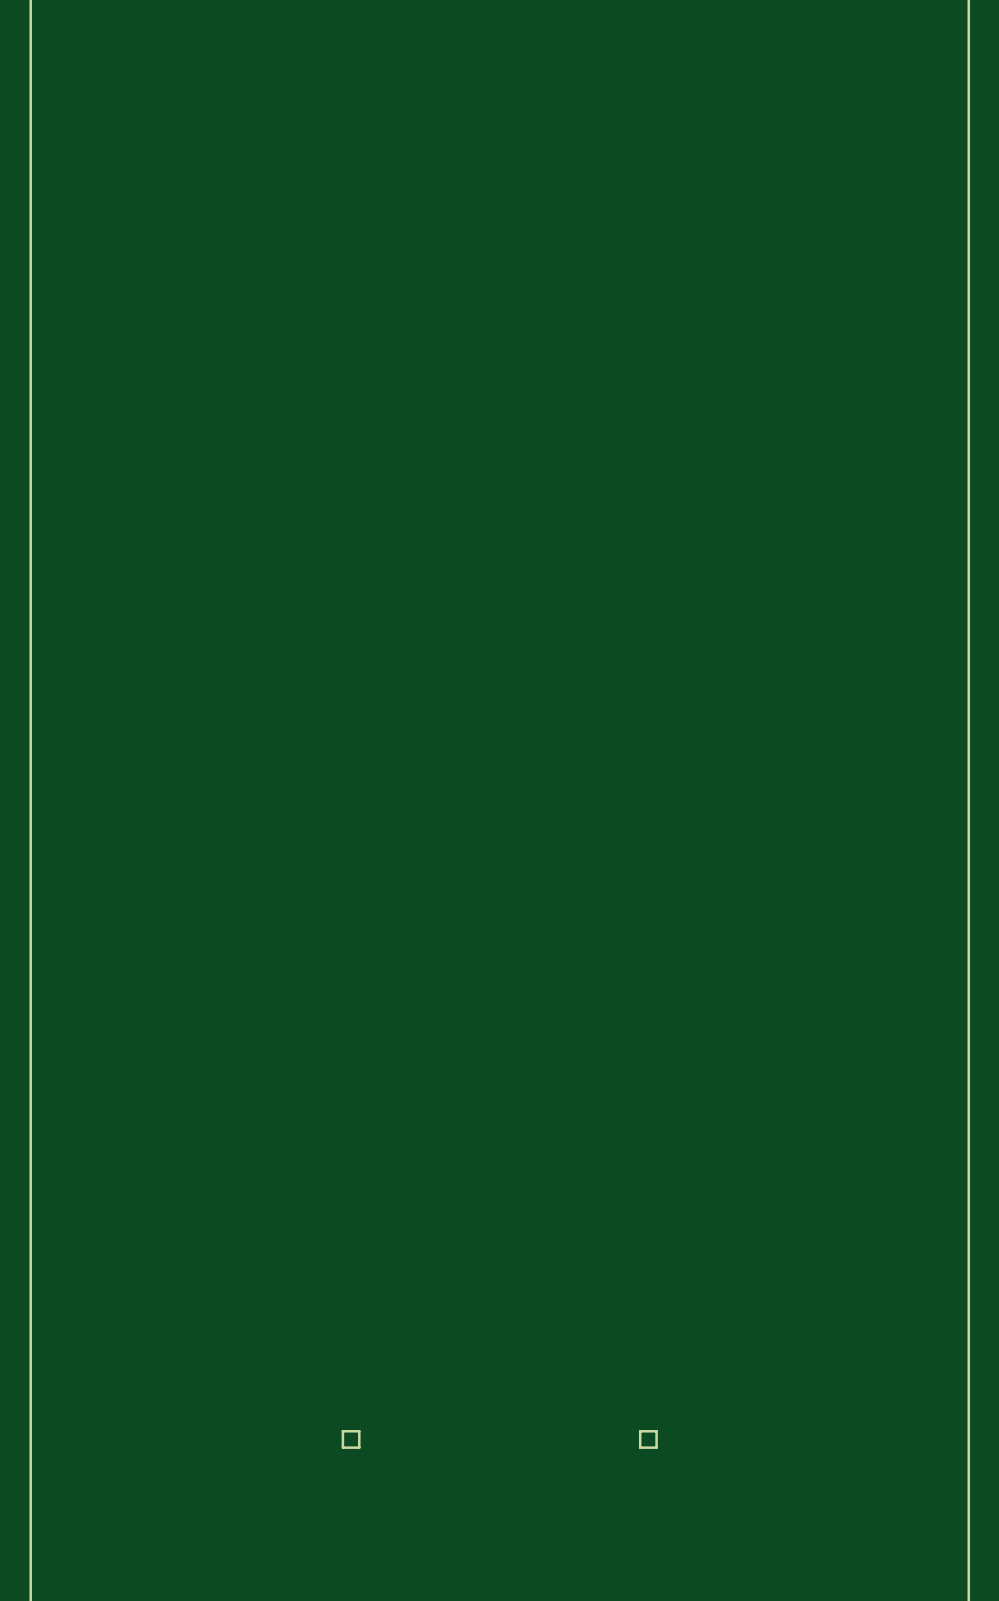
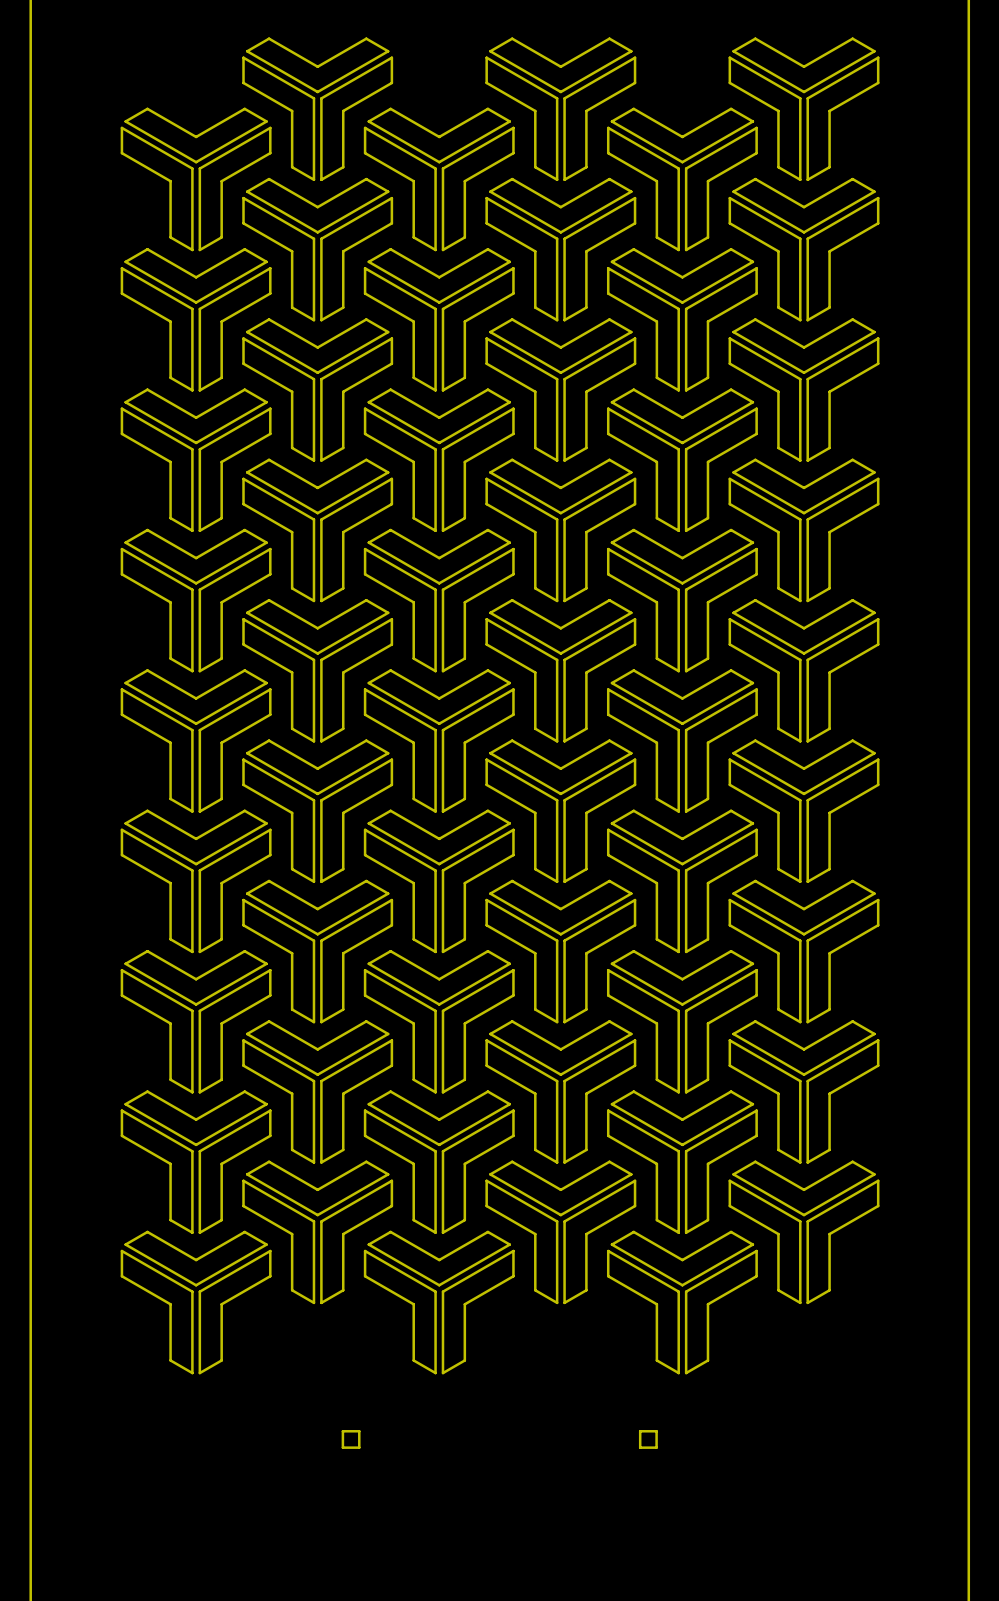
board edge: none -> (366, 38) (388, 51) (317, 91) (247, 51) (269, 38) (317, 66) (366, 38)
board edge: none -> (609, 38) (631, 51) (560, 91) (490, 51) (512, 38) (560, 66) (609, 38)
board edge: none -> (852, 38) (874, 51) (804, 91) (733, 51) (755, 38) (804, 66) (852, 38)
board edge: none -> (243, 57) (313, 98) (313, 179) (292, 167) (292, 111) (243, 82) (243, 57)
board edge: none -> (391, 57) (391, 82) (343, 111) (343, 167) (321, 179) (321, 98) (391, 57)
board edge: none -> (486, 57) (557, 98) (557, 179) (535, 167) (535, 111) (486, 82) (486, 57)
board edge: none -> (635, 57) (635, 82) (586, 111) (586, 167) (564, 179) (564, 98) (635, 57)
board edge: none -> (729, 57) (729, 82) (778, 111) (778, 167) (800, 179) (800, 98) (729, 57)
board edge: none -> (878, 57) (807, 98) (807, 179) (829, 167) (829, 111) (878, 82) (878, 57)
board edge: none -> (244, 108) (266, 121) (196, 162) (125, 121) (147, 108) (196, 136) (244, 108)
board edge: none -> (487, 108) (509, 121) (439, 162) (368, 121) (390, 108) (439, 136) (487, 108)
board edge: none -> (731, 108) (752, 121) (682, 162) (611, 121) (633, 108) (682, 136) (731, 108)
board edge: none -> (121, 127) (192, 168) (192, 249) (170, 237) (170, 181) (121, 153) (121, 127)
board edge: none -> (270, 127) (199, 168) (199, 249) (221, 237) (221, 181) (270, 153) (270, 127)
board edge: none -> (365, 127) (435, 168) (435, 249) (413, 237) (413, 181) (365, 153) (365, 127)
board edge: none -> (513, 127) (442, 168) (442, 249) (464, 237) (464, 181) (513, 153) (513, 127)
board edge: none -> (608, 127) (678, 168) (678, 249) (656, 237) (656, 181) (608, 153) (608, 127)
board edge: none -> (756, 127) (756, 153) (707, 181) (707, 237) (686, 249) (686, 168) (756, 127)
board edge: none -> (366, 179) (388, 191) (317, 232) (247, 191) (269, 179) (317, 207) (366, 179)
board edge: none -> (609, 179) (560, 207) (512, 179) (490, 191) (560, 232) (631, 191) (609, 179)
board edge: none -> (852, 179) (874, 191) (804, 232) (733, 191) (755, 179) (804, 207) (852, 179)
board edge: none -> (243, 198) (313, 238) (313, 320) (292, 307) (292, 251) (243, 223) (243, 198)
board edge: none -> (391, 198) (321, 238) (321, 320) (343, 307) (343, 251) (391, 223) (391, 198)
board edge: none -> (486, 198) (557, 238) (557, 320) (535, 307) (535, 251) (486, 223) (486, 198)
board edge: none -> (635, 198) (564, 238) (564, 320) (586, 307) (586, 251) (635, 223) (635, 198)
board edge: none -> (729, 198) (800, 238) (800, 320) (778, 307) (778, 251) (729, 223) (729, 198)
board edge: none -> (878, 198) (878, 223) (829, 251) (829, 307) (807, 320) (807, 238) (878, 198)
board edge: none -> (244, 249) (266, 261) (196, 302) (125, 261) (147, 249) (196, 277) (244, 249)
board edge: none -> (487, 249) (439, 277) (390, 249) (368, 261) (439, 302) (509, 261) (487, 249)
board edge: none -> (731, 249) (682, 277) (633, 249) (611, 261) (682, 302) (752, 261) (731, 249)
board edge: none -> (121, 268) (192, 309) (192, 390) (170, 377) (170, 321) (121, 293) (121, 268)
board edge: none -> (270, 268) (199, 309) (199, 390) (221, 377) (221, 321) (270, 293) (270, 268)
board edge: none -> (365, 268) (435, 309) (435, 390) (413, 377) (413, 321) (365, 293) (365, 268)
board edge: none -> (513, 268) (442, 309) (442, 390) (464, 377) (464, 321) (513, 293) (513, 268)
board edge: none -> (608, 268) (678, 309) (678, 390) (656, 377) (656, 321) (608, 293) (608, 268)
board edge: none -> (756, 268) (756, 293) (707, 321) (707, 377) (686, 390) (686, 309) (756, 268)
board edge: none -> (366, 319) (317, 347) (269, 319) (247, 332) (317, 372) (388, 332) (366, 319)
board edge: none -> (609, 319) (560, 347) (512, 319) (490, 332) (560, 372) (631, 332) (609, 319)
board edge: none -> (852, 319) (804, 347) (755, 319) (733, 332) (804, 372) (874, 332) (852, 319)
board edge: none -> (243, 338) (313, 379) (313, 460) (292, 447) (292, 391) (243, 363) (243, 338)
board edge: none -> (391, 338) (321, 379) (321, 460) (343, 447) (343, 391) (391, 363) (391, 338)
board edge: none -> (486, 338) (557, 379) (557, 460) (535, 447) (535, 391) (486, 363) (486, 338)
board edge: none -> (635, 338) (635, 363) (586, 391) (586, 447) (564, 460) (564, 379) (635, 338)
board edge: none -> (729, 338) (729, 363) (778, 391) (778, 447) (800, 460) (800, 379) (729, 338)
board edge: none -> (878, 338) (878, 363) (829, 391) (829, 447) (807, 460) (807, 379) (878, 338)
board edge: none -> (244, 389) (196, 417) (147, 389) (125, 402) (196, 442) (266, 402) (244, 389)
board edge: none -> (487, 389) (439, 417) (390, 389) (368, 402) (439, 442) (509, 402) (487, 389)
board edge: none -> (731, 389) (682, 417) (633, 389) (611, 402) (682, 442) (752, 402) (731, 389)
board edge: none -> (121, 408) (192, 449) (192, 530) (170, 518) (170, 461) (121, 433) (121, 408)
board edge: none -> (270, 408) (199, 449) (199, 530) (221, 518) (221, 461) (270, 433) (270, 408)
board edge: none -> (365, 408) (435, 449) (435, 530) (413, 518) (413, 461) (365, 433) (365, 408)
board edge: none -> (513, 408) (442, 449) (442, 530) (464, 518) (464, 461) (513, 433) (513, 408)
board edge: none -> (608, 408) (678, 449) (678, 530) (656, 518) (656, 461) (608, 433) (608, 408)
board edge: none -> (756, 408) (756, 433) (707, 461) (707, 518) (686, 530) (686, 449) (756, 408)
board edge: none -> (366, 459) (317, 487) (269, 459) (247, 472) (317, 513) (388, 472) (366, 459)
board edge: none -> (609, 459) (560, 487) (512, 459) (490, 472) (560, 513) (631, 472) (609, 459)
board edge: none -> (852, 459) (874, 472) (804, 513) (733, 472) (755, 459) (804, 487) (852, 459)
board edge: none -> (243, 478) (313, 519) (313, 600) (292, 588) (292, 532) (243, 504) (243, 478)
board edge: none -> (391, 478) (321, 519) (321, 600) (343, 588) (343, 532) (391, 504) (391, 478)
board edge: none -> (486, 478) (557, 519) (557, 600) (535, 588) (535, 532) (486, 504) (486, 478)
board edge: none -> (635, 478) (564, 519) (564, 600) (586, 588) (586, 532) (635, 504) (635, 478)
board edge: none -> (729, 478) (800, 519) (800, 600) (778, 588) (778, 532) (729, 504) (729, 478)
board edge: none -> (878, 478) (878, 504) (829, 532) (829, 588) (807, 600) (807, 519) (878, 478)
board edge: none -> (244, 530) (196, 558) (147, 530) (125, 542) (196, 583) (266, 542) (244, 530)
board edge: none -> (487, 530) (439, 558) (390, 530) (368, 542) (439, 583) (509, 542) (487, 530)
board edge: none -> (731, 530) (752, 542) (682, 583) (611, 542) (633, 530) (682, 558) (731, 530)
board edge: none -> (121, 549) (192, 589) (192, 671) (170, 658) (170, 602) (121, 574) (121, 549)
board edge: none -> (270, 549) (199, 589) (199, 671) (221, 658) (221, 602) (270, 574) (270, 549)
board edge: none -> (365, 549) (435, 589) (435, 671) (413, 658) (413, 602) (365, 574) (365, 549)
board edge: none -> (513, 549) (442, 589) (442, 671) (464, 658) (464, 602) (513, 574) (513, 549)
board edge: none -> (608, 549) (678, 589) (678, 671) (656, 658) (656, 602) (608, 574) (608, 549)
board edge: none -> (756, 549) (756, 574) (707, 602) (707, 658) (686, 671) (686, 589) (756, 549)
board edge: none -> (366, 600) (317, 628) (269, 600) (247, 612) (317, 653) (388, 612) (366, 600)
board edge: none -> (609, 600) (631, 612) (560, 653) (490, 612) (512, 600) (560, 628) (609, 600)
board edge: none -> (852, 600) (804, 628) (755, 600) (733, 612) (804, 653) (874, 612) (852, 600)
board edge: none -> (243, 619) (313, 659) (313, 741) (292, 728) (292, 672) (243, 644) (243, 619)
board edge: none -> (391, 619) (321, 659) (321, 741) (343, 728) (343, 672) (391, 644) (391, 619)
board edge: none -> (486, 619) (557, 659) (557, 741) (535, 728) (535, 672) (486, 644) (486, 619)
board edge: none -> (635, 619) (635, 644) (586, 672) (586, 728) (564, 741) (564, 659) (635, 619)
board edge: none -> (729, 619) (729, 644) (778, 672) (778, 728) (800, 741) (800, 659) (729, 619)
board edge: none -> (878, 619) (878, 644) (829, 672) (829, 728) (807, 741) (807, 659) (878, 619)
board edge: none -> (244, 670) (196, 698) (147, 670) (125, 683) (196, 723) (266, 683) (244, 670)
board edge: none -> (487, 670) (509, 683) (439, 723) (368, 683) (390, 670) (439, 698) (487, 670)
board edge: none -> (731, 670) (752, 683) (682, 723) (611, 683) (633, 670) (682, 698) (731, 670)
board edge: none -> (121, 689) (192, 730) (192, 811) (170, 798) (170, 742) (121, 714) (121, 689)
board edge: none -> (270, 689) (199, 730) (199, 811) (221, 798) (221, 742) (270, 714) (270, 689)
board edge: none -> (365, 689) (435, 730) (435, 811) (413, 798) (413, 742) (365, 714) (365, 689)
board edge: none -> (513, 689) (442, 730) (442, 811) (464, 798) (464, 742) (513, 714) (513, 689)
board edge: none -> (608, 689) (678, 730) (678, 811) (656, 798) (656, 742) (608, 714) (608, 689)
board edge: none -> (756, 689) (756, 714) (707, 742) (707, 798) (686, 811) (686, 730) (756, 689)
board edge: none -> (366, 740) (388, 753) (317, 793) (247, 753) (269, 740) (317, 768) (366, 740)
board edge: none -> (609, 740) (631, 753) (560, 793) (490, 753) (512, 740) (560, 768) (609, 740)
board edge: none -> (852, 740) (874, 753) (804, 793) (733, 753) (755, 740) (804, 768) (852, 740)
board edge: none -> (243, 759) (313, 800) (313, 881) (292, 869) (292, 812) (243, 784) (243, 759)
board edge: none -> (391, 759) (321, 800) (321, 881) (343, 869) (343, 812) (391, 784) (391, 759)
board edge: none -> (486, 759) (557, 800) (557, 881) (535, 869) (535, 812) (486, 784) (486, 759)
board edge: none -> (635, 759) (635, 784) (586, 812) (586, 869) (564, 881) (564, 800) (635, 759)
board edge: none -> (729, 759) (729, 784) (778, 812) (778, 869) (800, 881) (800, 800) (729, 759)
board edge: none -> (878, 759) (878, 784) (829, 812) (829, 869) (807, 881) (807, 800) (878, 759)
board edge: none -> (244, 810) (266, 823) (196, 864) (125, 823) (147, 810) (196, 838) (244, 810)
board edge: none -> (487, 810) (509, 823) (439, 864) (368, 823) (390, 810) (439, 838) (487, 810)
board edge: none -> (731, 810) (752, 823) (682, 864) (611, 823) (633, 810) (682, 838) (731, 810)
board edge: none -> (121, 829) (192, 870) (192, 951) (170, 939) (170, 883) (121, 855) (121, 829)
board edge: none -> (270, 829) (199, 870) (199, 951) (221, 939) (221, 883) (270, 855) (270, 829)
board edge: none -> (365, 829) (435, 870) (435, 951) (413, 939) (413, 883) (365, 855) (365, 829)
board edge: none -> (513, 829) (442, 870) (442, 951) (464, 939) (464, 883) (513, 855) (513, 829)
board edge: none -> (608, 829) (678, 870) (678, 951) (656, 939) (656, 883) (608, 855) (608, 829)
board edge: none -> (756, 829) (756, 855) (707, 883) (707, 939) (686, 951) (686, 870) (756, 829)
board edge: none -> (366, 881) (317, 909) (269, 881) (247, 893) (317, 934) (388, 893) (366, 881)
board edge: none -> (609, 881) (631, 893) (560, 934) (490, 893) (512, 881) (560, 909) (609, 881)
board edge: none -> (852, 881) (874, 893) (804, 934) (733, 893) (755, 881) (804, 909) (852, 881)
board edge: none -> (243, 900) (313, 940) (313, 1022) (292, 1009) (292, 953) (243, 925) (243, 900)
board edge: none -> (391, 900) (321, 940) (321, 1022) (343, 1009) (343, 953) (391, 925) (391, 900)
board edge: none -> (486, 900) (557, 940) (557, 1022) (535, 1009) (535, 953) (486, 925) (486, 900)
board edge: none -> (635, 900) (635, 925) (586, 953) (586, 1009) (564, 1022) (564, 940) (635, 900)
board edge: none -> (729, 900) (729, 925) (778, 953) (778, 1009) (800, 1022) (800, 940) (729, 900)
board edge: none -> (878, 900) (878, 925) (829, 953) (829, 1009) (807, 1022) (807, 940) (878, 900)
board edge: none -> (244, 951) (196, 979) (147, 951) (125, 963) (196, 1004) (266, 963) (244, 951)
board edge: none -> (487, 951) (509, 963) (439, 1004) (368, 963) (390, 951) (439, 979) (487, 951)
board edge: none -> (731, 951) (752, 963) (682, 1004) (611, 963) (633, 951) (682, 979) (731, 951)
board edge: none -> (121, 970) (192, 1010) (192, 1092) (170, 1079) (170, 1023) (121, 995) (121, 970)
board edge: none -> (270, 970) (199, 1010) (199, 1092) (221, 1079) (221, 1023) (270, 995) (270, 970)
board edge: none -> (365, 970) (435, 1010) (435, 1092) (413, 1079) (413, 1023) (365, 995) (365, 970)
board edge: none -> (513, 970) (442, 1010) (442, 1092) (464, 1079) (464, 1023) (513, 995) (513, 970)
board edge: none -> (608, 970) (678, 1010) (678, 1092) (656, 1079) (656, 1023) (608, 995) (608, 970)
board edge: none -> (756, 970) (756, 995) (707, 1023) (707, 1079) (686, 1092) (686, 1010) (756, 970)
board edge: none -> (366, 1021) (317, 1049) (269, 1021) (247, 1034) (317, 1074) (388, 1034) (366, 1021)
board edge: none -> (609, 1021) (560, 1049) (512, 1021) (490, 1034) (560, 1074) (631, 1034) (609, 1021)
board edge: none -> (852, 1021) (874, 1034) (804, 1074) (733, 1034) (755, 1021) (804, 1049) (852, 1021)
board edge: none -> (243, 1040) (313, 1081) (313, 1162) (292, 1149) (292, 1093) (243, 1065) (243, 1040)
board edge: none -> (391, 1040) (321, 1081) (321, 1162) (343, 1149) (343, 1093) (391, 1065) (391, 1040)
board edge: none -> (486, 1040) (557, 1081) (557, 1162) (535, 1149) (535, 1093) (486, 1065) (486, 1040)
board edge: none -> (635, 1040) (635, 1065) (586, 1093) (586, 1149) (564, 1162) (564, 1081) (635, 1040)
board edge: none -> (729, 1040) (729, 1065) (778, 1093) (778, 1149) (800, 1162) (800, 1081) (729, 1040)
board edge: none -> (878, 1040) (878, 1065) (829, 1093) (829, 1149) (807, 1162) (807, 1081) (878, 1040)
board edge: none -> (244, 1091) (196, 1119) (147, 1091) (125, 1104) (196, 1144) (266, 1104) (244, 1091)
board edge: none -> (487, 1091) (439, 1119) (390, 1091) (368, 1104) (439, 1144) (509, 1104) (487, 1091)
board edge: none -> (731, 1091) (752, 1104) (682, 1144) (611, 1104) (633, 1091) (682, 1119) (731, 1091)
board edge: none -> (121, 1110) (121, 1135) (170, 1163) (170, 1220) (192, 1232) (192, 1151) (121, 1110)
board edge: none -> (270, 1110) (199, 1151) (199, 1232) (221, 1220) (221, 1163) (270, 1135) (270, 1110)
board edge: none -> (365, 1110) (365, 1135) (413, 1163) (413, 1220) (435, 1232) (435, 1151) (365, 1110)
board edge: none -> (513, 1110) (442, 1151) (442, 1232) (464, 1220) (464, 1163) (513, 1135) (513, 1110)
board edge: none -> (608, 1110) (678, 1151) (678, 1232) (656, 1220) (656, 1163) (608, 1135) (608, 1110)
board edge: none -> (756, 1110) (756, 1135) (707, 1163) (707, 1220) (686, 1232) (686, 1151) (756, 1110)
board edge: none -> (366, 1161) (317, 1189) (269, 1161) (247, 1174) (317, 1215) (388, 1174) (366, 1161)
board edge: none -> (609, 1161) (560, 1189) (512, 1161) (490, 1174) (560, 1215) (631, 1174) (609, 1161)
board edge: none -> (852, 1161) (874, 1174) (804, 1215) (733, 1174) (755, 1161) (804, 1189) (852, 1161)
board edge: none -> (243, 1180) (313, 1221) (313, 1302) (292, 1290) (292, 1234) (243, 1206) (243, 1180)
board edge: none -> (391, 1180) (321, 1221) (321, 1302) (343, 1290) (343, 1234) (391, 1206) (391, 1180)
board edge: none -> (486, 1180) (486, 1206) (535, 1234) (535, 1290) (557, 1302) (557, 1221) (486, 1180)
board edge: none -> (635, 1180) (635, 1206) (586, 1234) (586, 1290) (564, 1302) (564, 1221) (635, 1180)
board edge: none -> (729, 1180) (729, 1206) (778, 1234) (778, 1290) (800, 1302) (800, 1221) (729, 1180)
board edge: none -> (878, 1180) (878, 1206) (829, 1234) (829, 1290) (807, 1302) (807, 1221) (878, 1180)
board edge: none -> (244, 1231) (196, 1260) (147, 1231) (125, 1244) (196, 1285) (266, 1244) (244, 1231)
board edge: none -> (487, 1231) (439, 1260) (390, 1231) (368, 1244) (439, 1285) (509, 1244) (487, 1231)
board edge: none -> (731, 1231) (682, 1260) (633, 1231) (611, 1244) (682, 1285) (752, 1244) (731, 1231)
board edge: none -> (121, 1251) (121, 1276) (170, 1304) (170, 1360) (192, 1373) (192, 1291) (121, 1251)
board edge: none -> (270, 1251) (199, 1291) (199, 1373) (221, 1360) (221, 1304) (270, 1276) (270, 1251)
board edge: none -> (365, 1251) (365, 1276) (413, 1304) (413, 1360) (435, 1373) (435, 1291) (365, 1251)
board edge: none -> (513, 1251) (442, 1291) (442, 1373) (464, 1360) (464, 1304) (513, 1276) (513, 1251)
board edge: none -> (608, 1251) (608, 1276) (656, 1304) (656, 1360) (678, 1373) (678, 1291) (608, 1251)
board edge: none -> (756, 1251) (756, 1276) (707, 1304) (707, 1360) (686, 1373) (686, 1291) (756, 1251)

